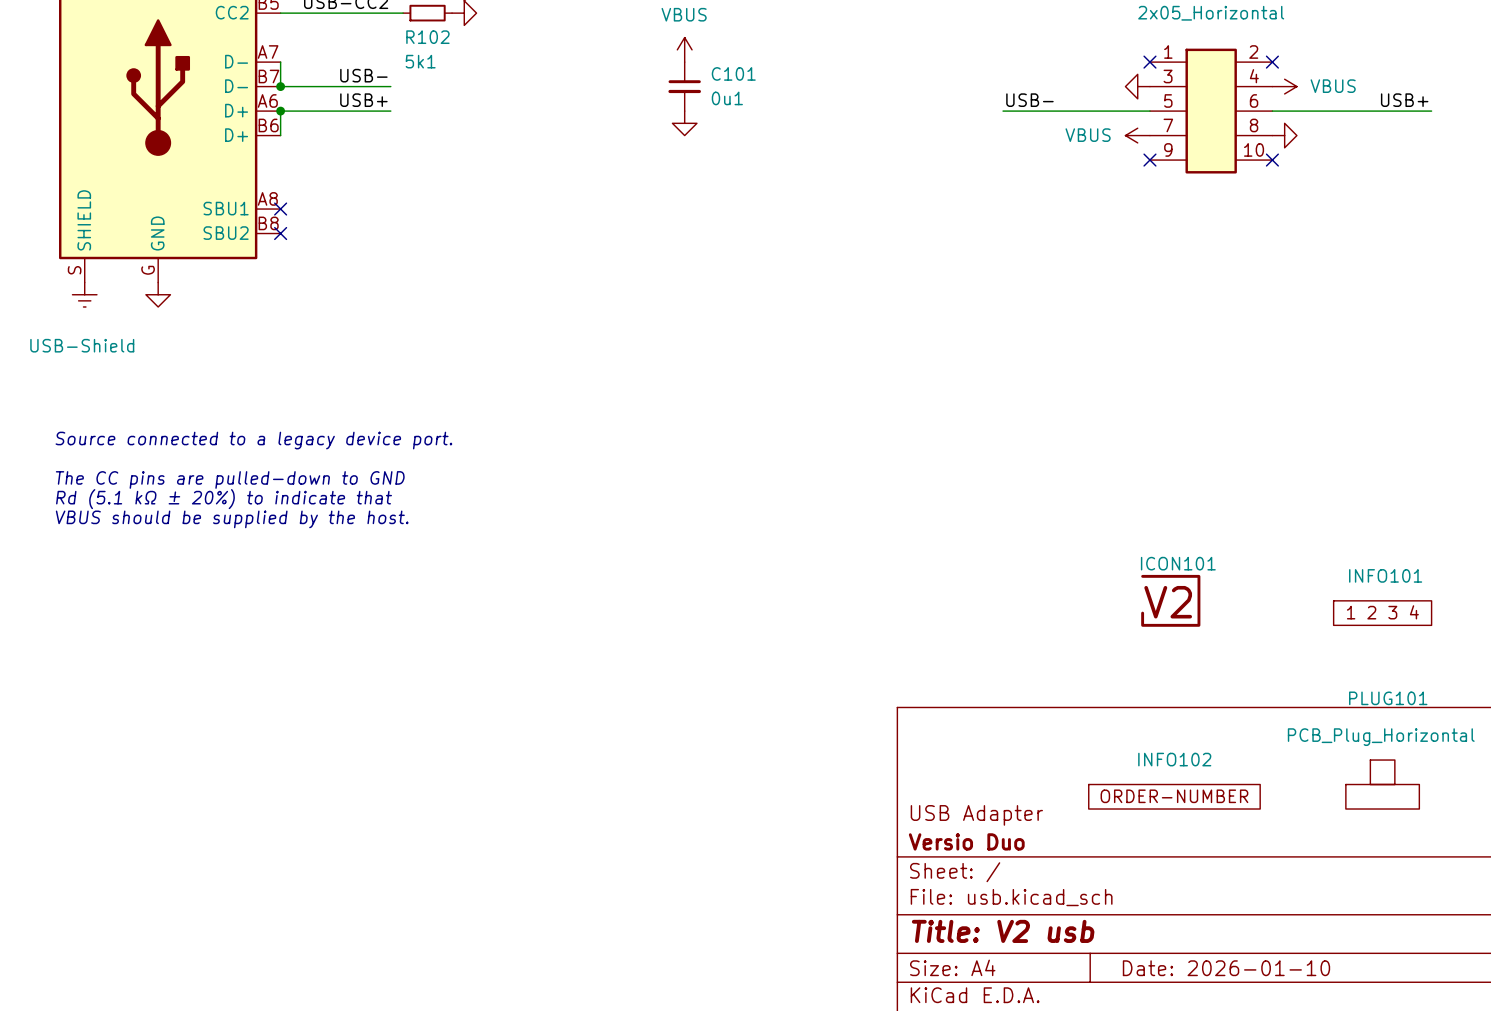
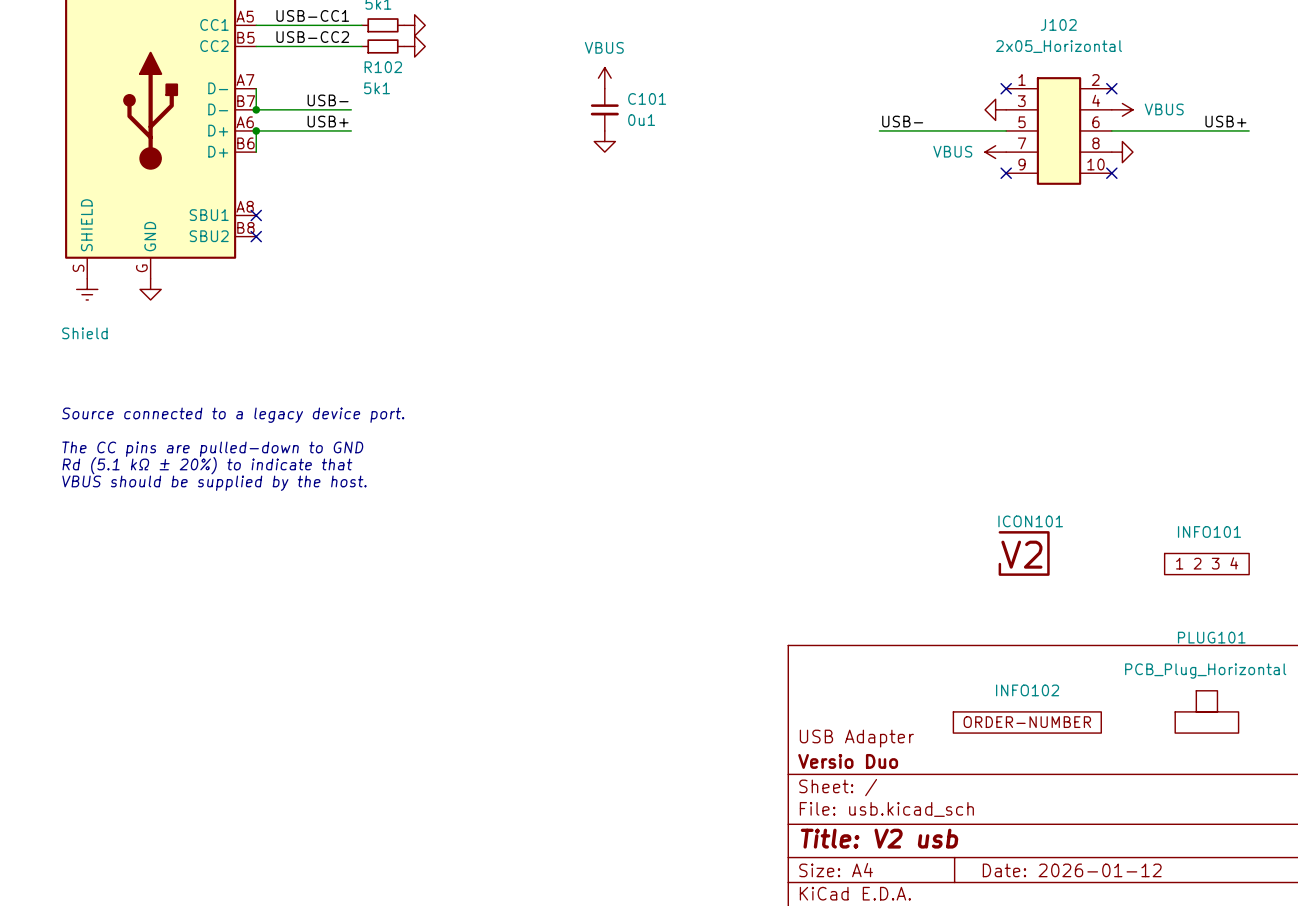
power symbol: USB-Shield (84, 294) -> Shield (87, 289)
title block: Date: 2026-01-10 (1226, 968) -> Date: 2026-01-12 (1072, 870)

